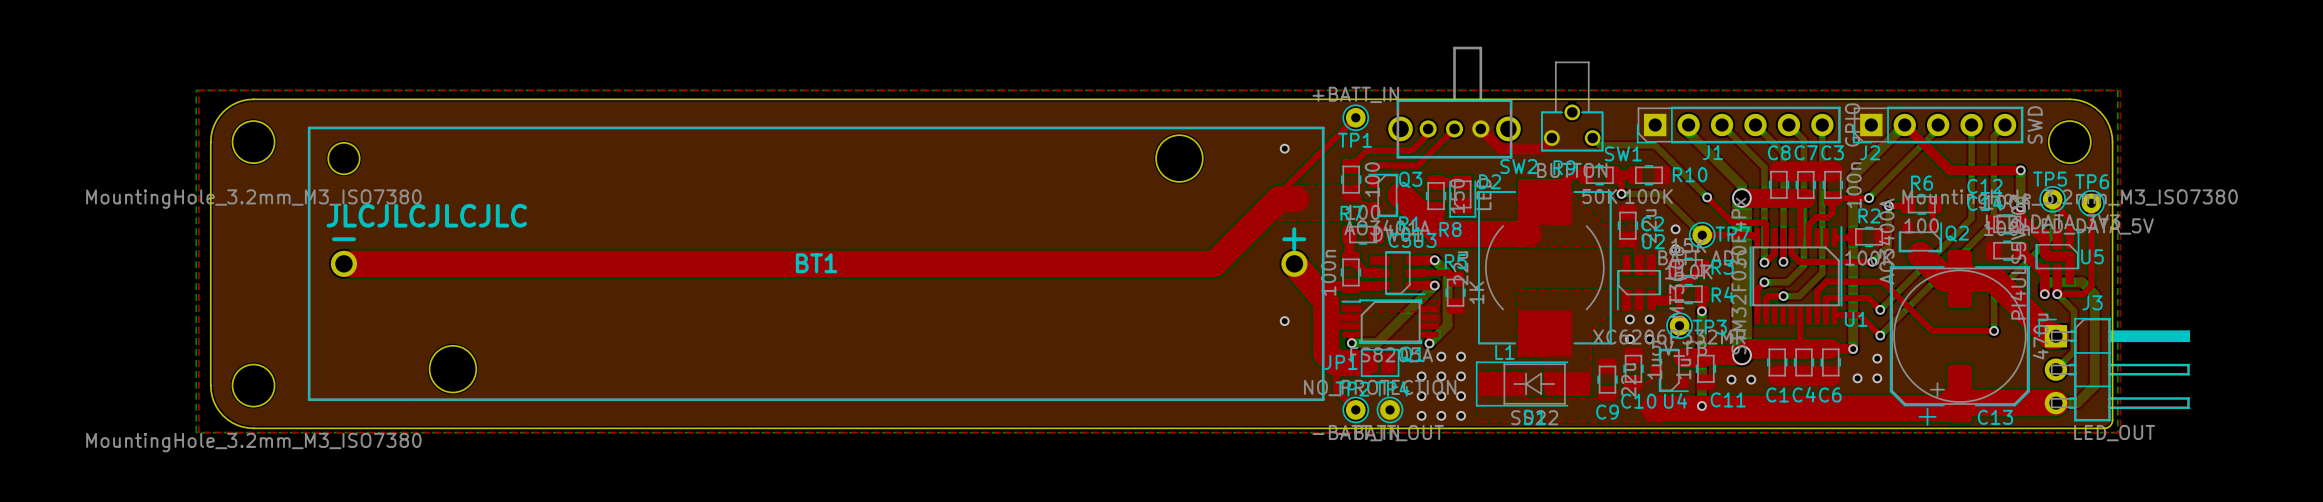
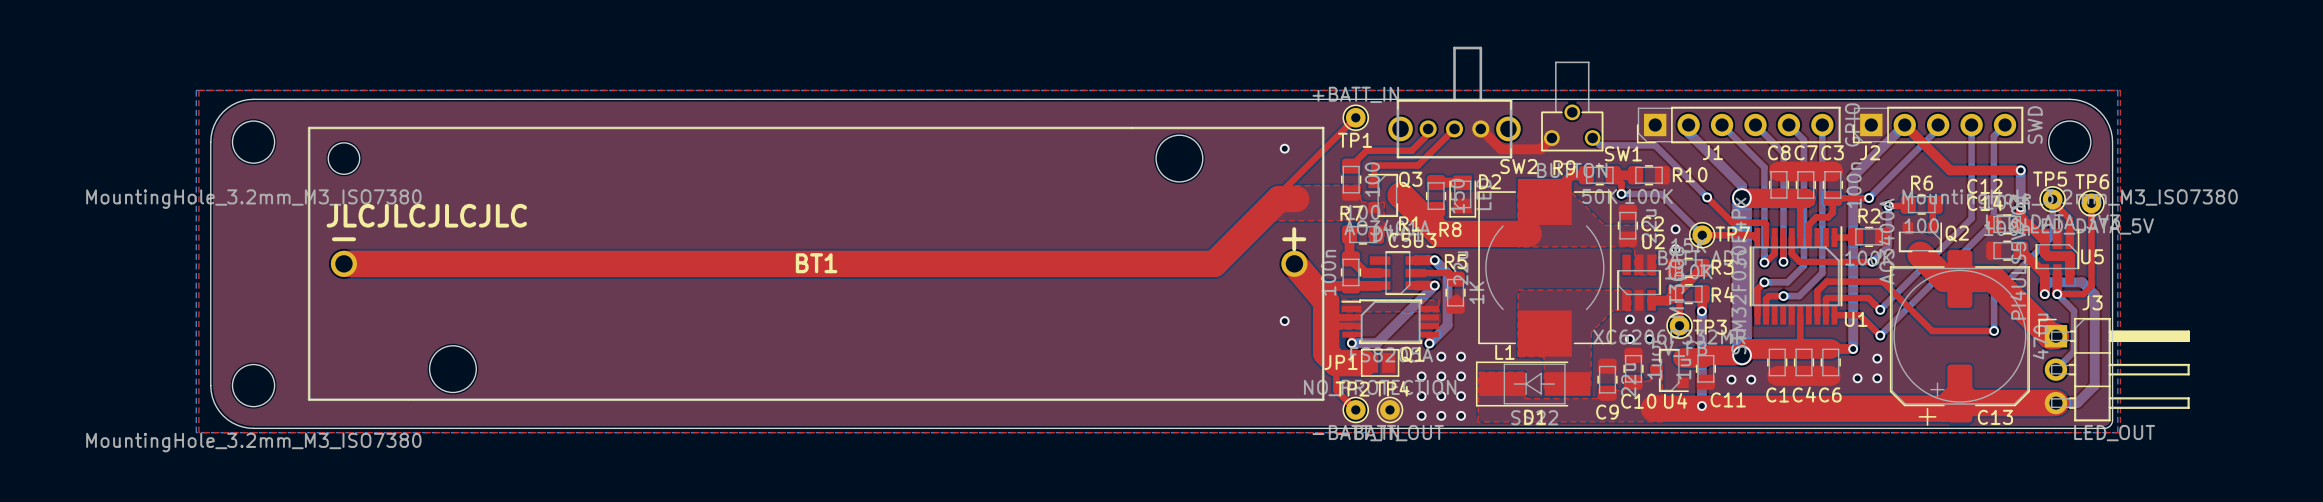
top track: none -> (1456, 299) (1456, 299)

